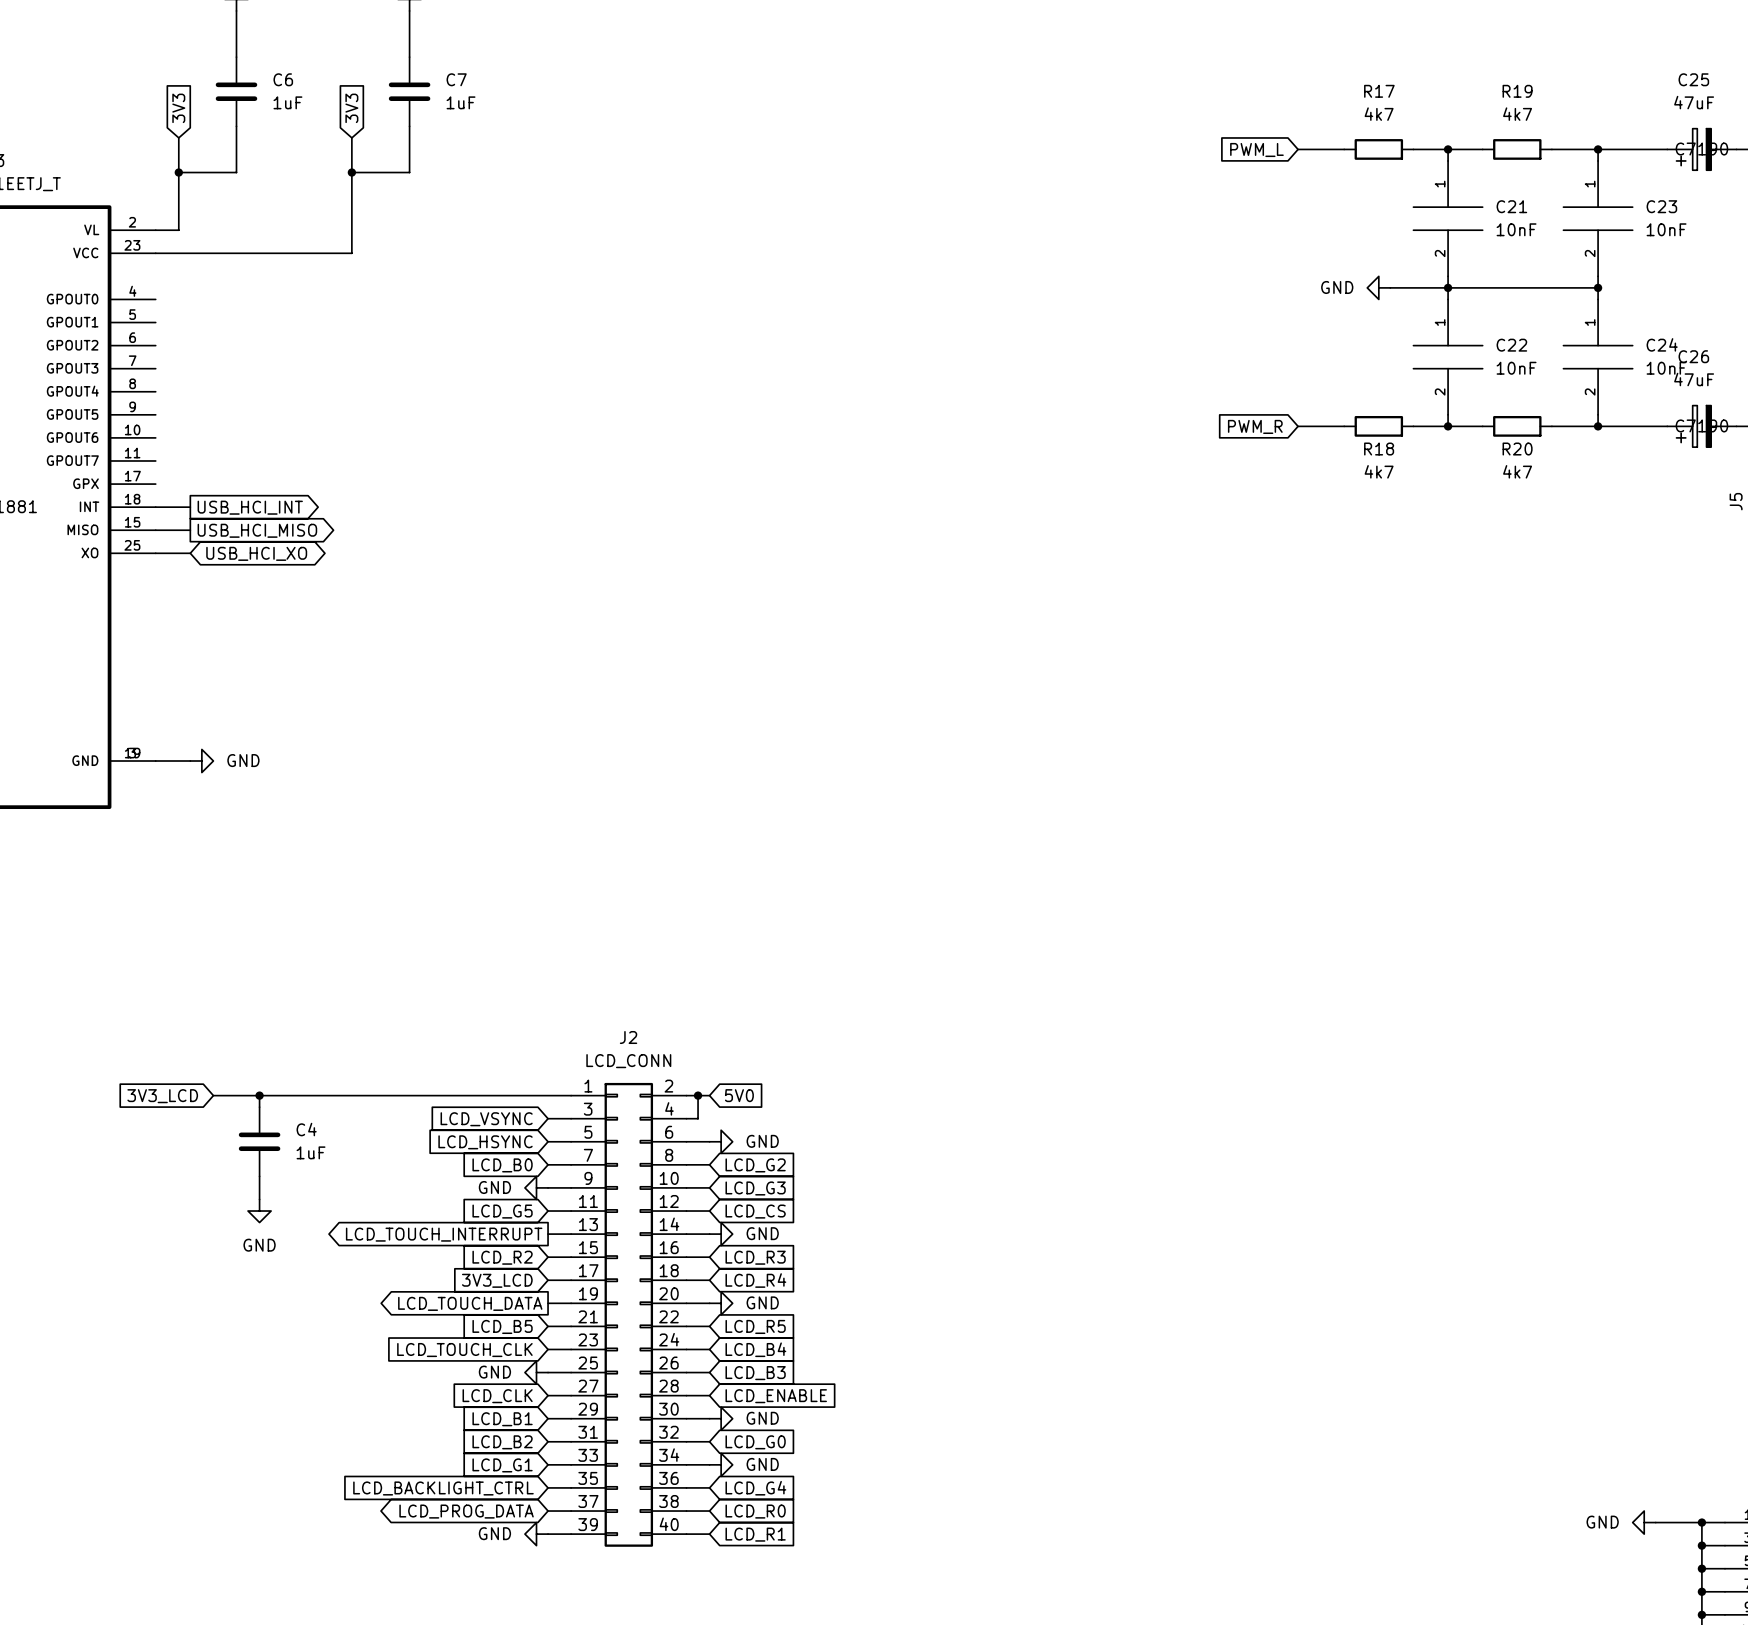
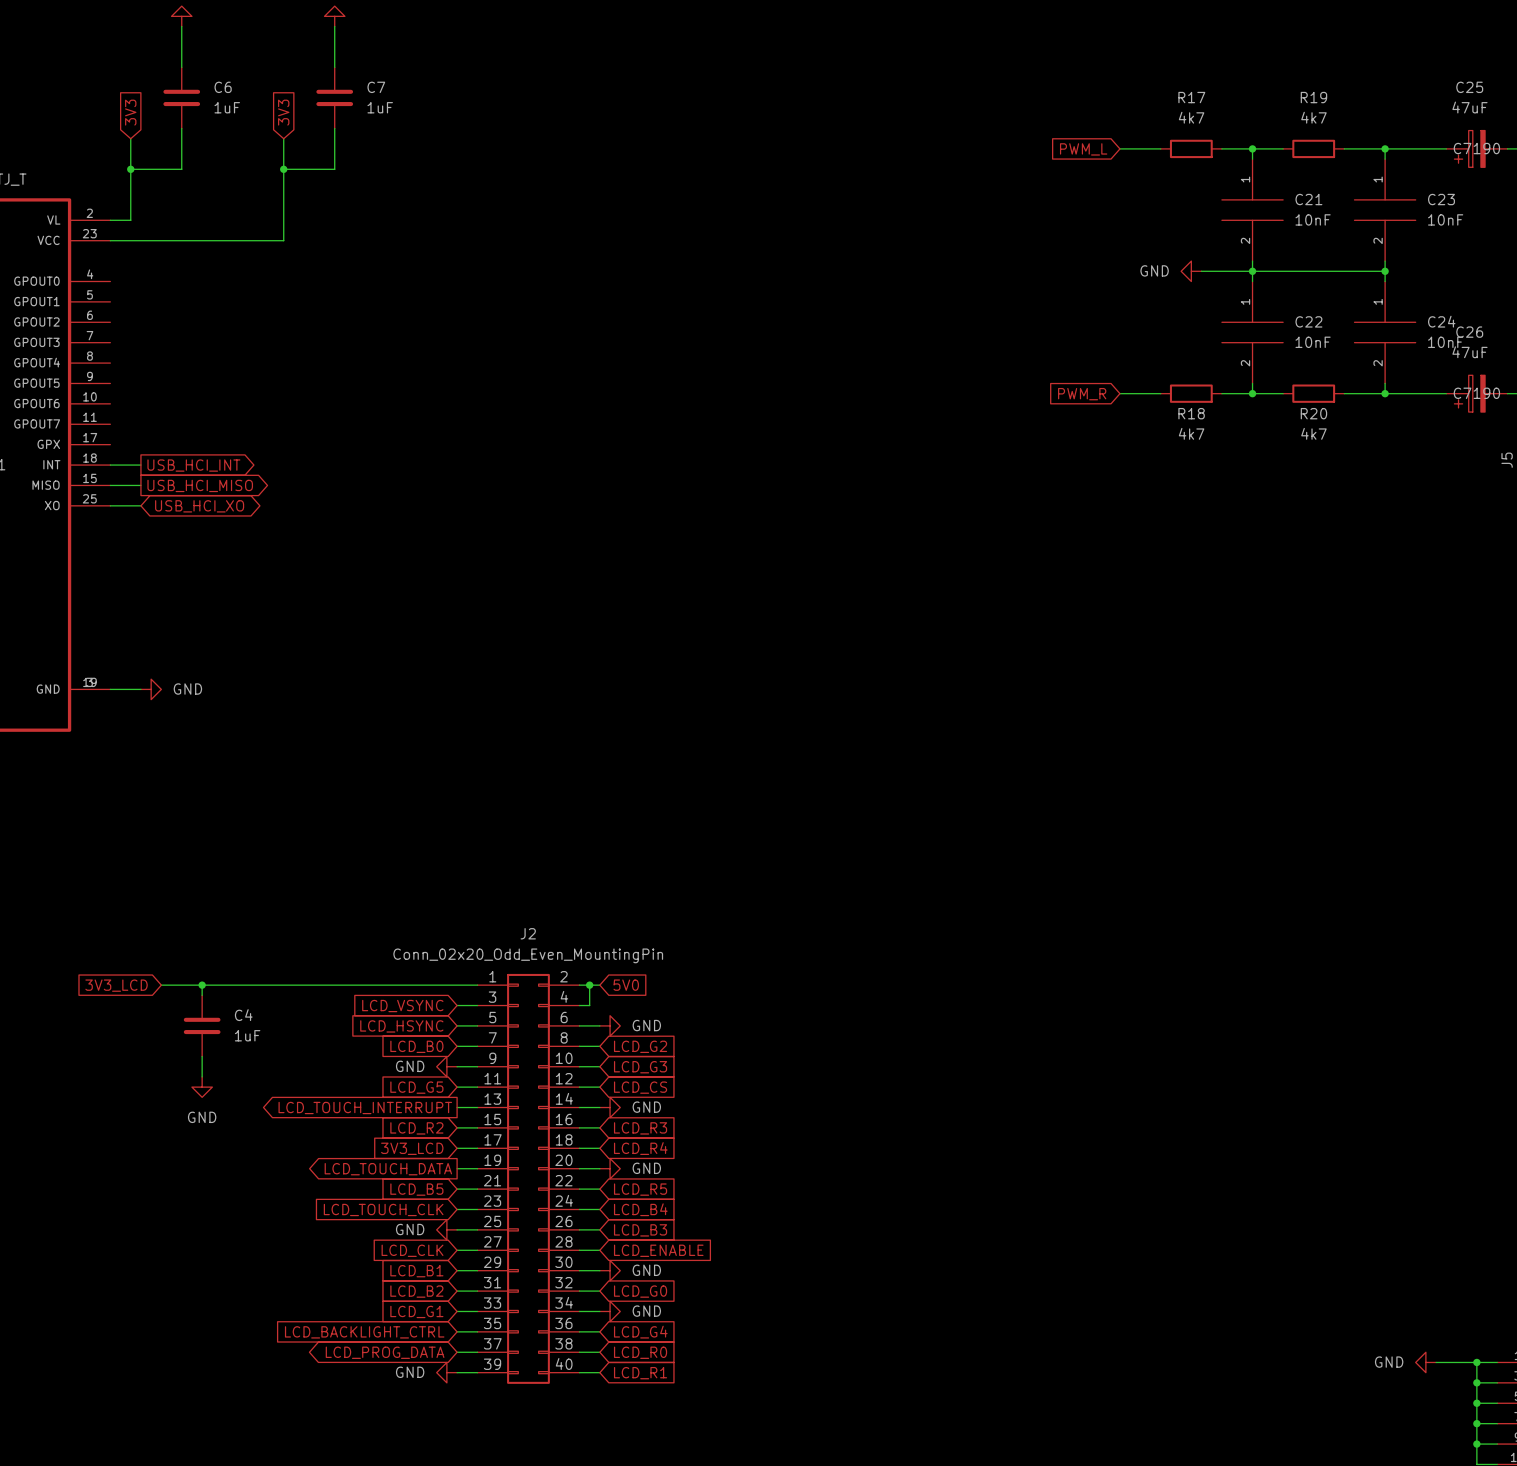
J2 value: LCD_CONN (628, 1061) -> Conn_02x20_Odd_Even_MountingPin (528, 955)

